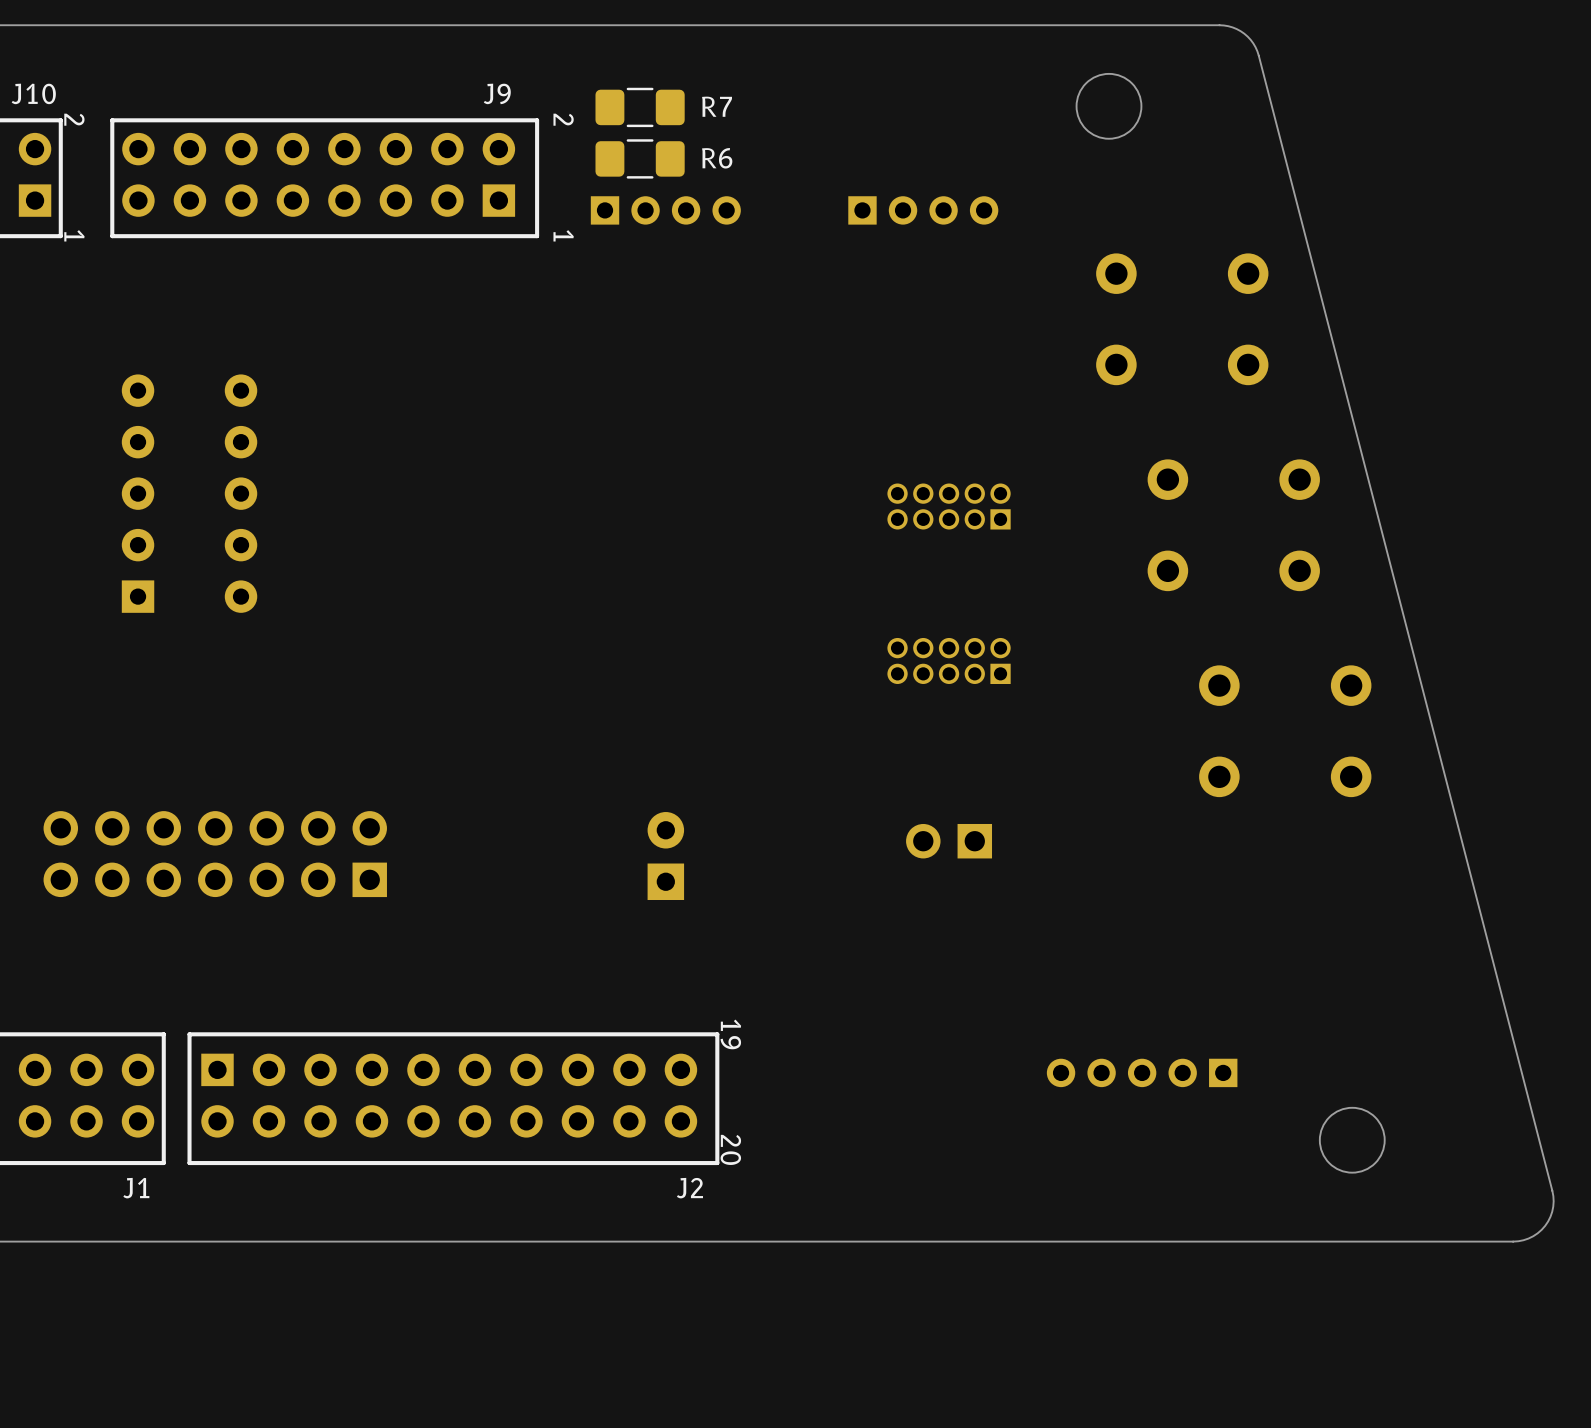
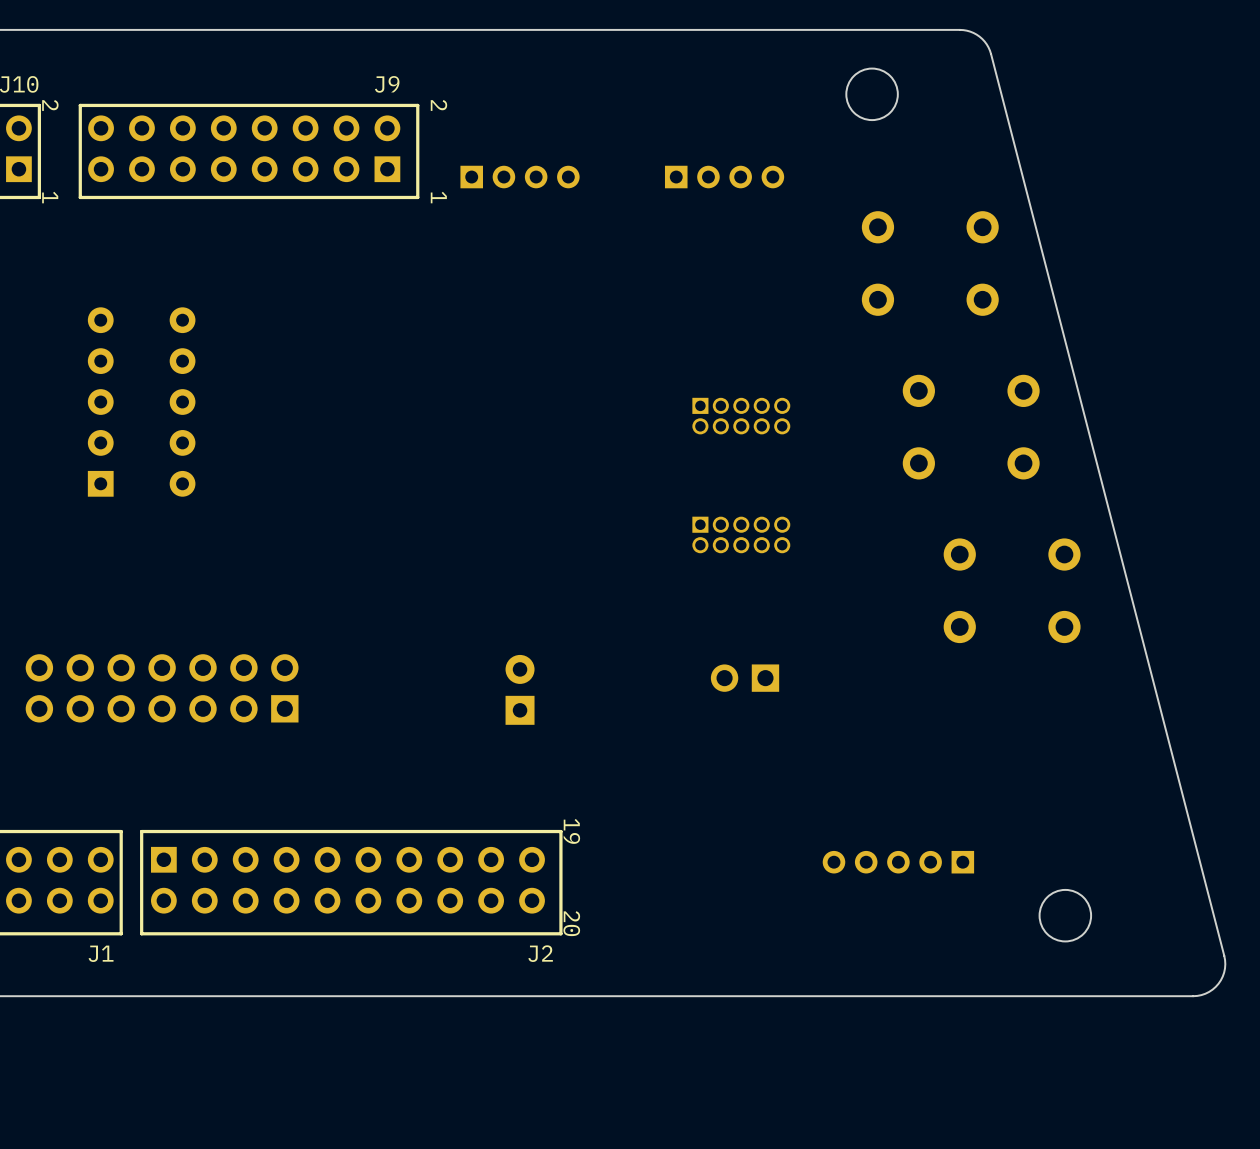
R7: (640, 107) -> none
R6: (640, 158) -> none
part rotation: 0° (949, 506) -> 180° (741, 416)
part rotation: 0° (949, 660) -> 180° (741, 534)

